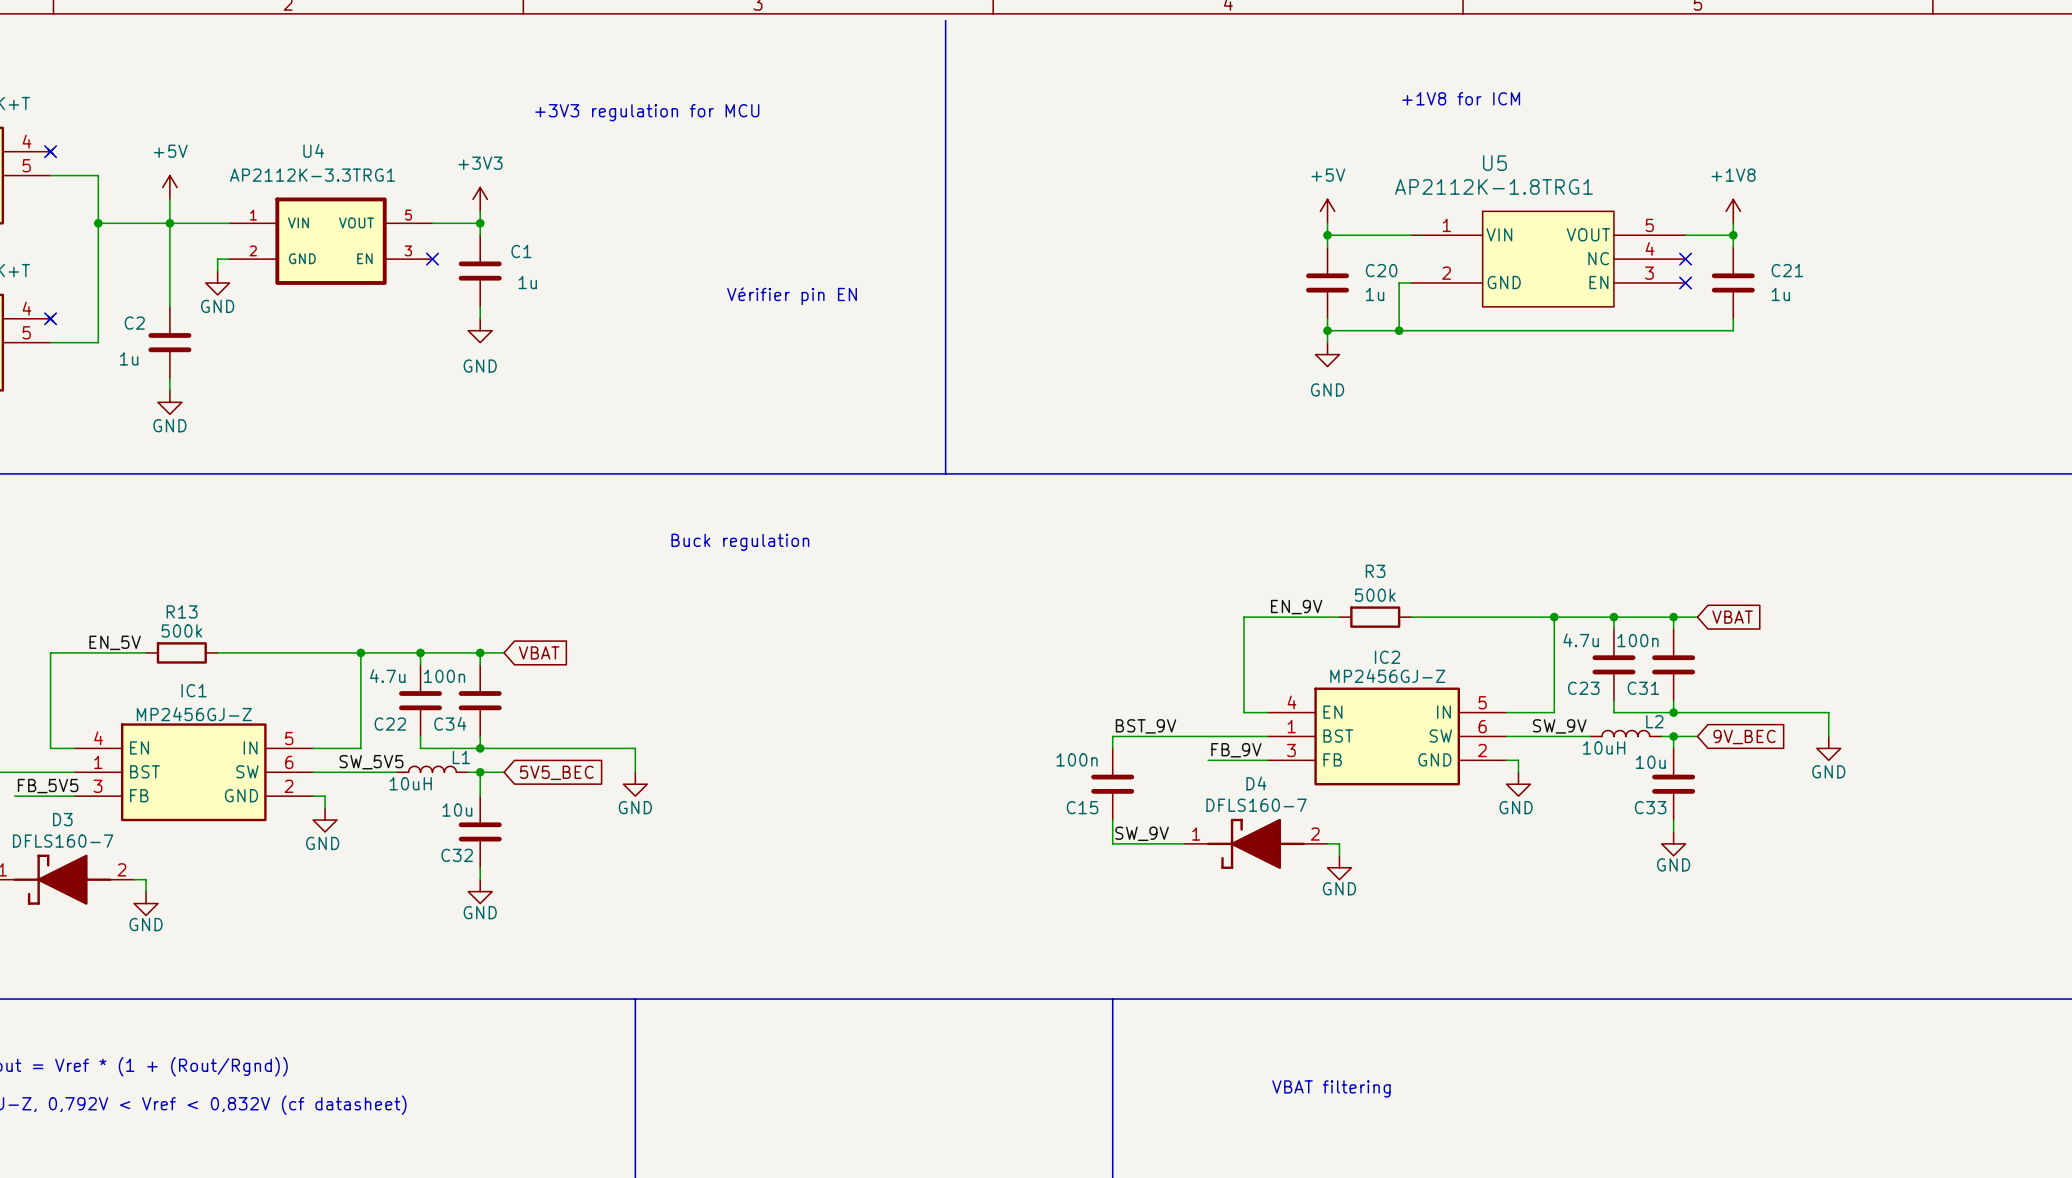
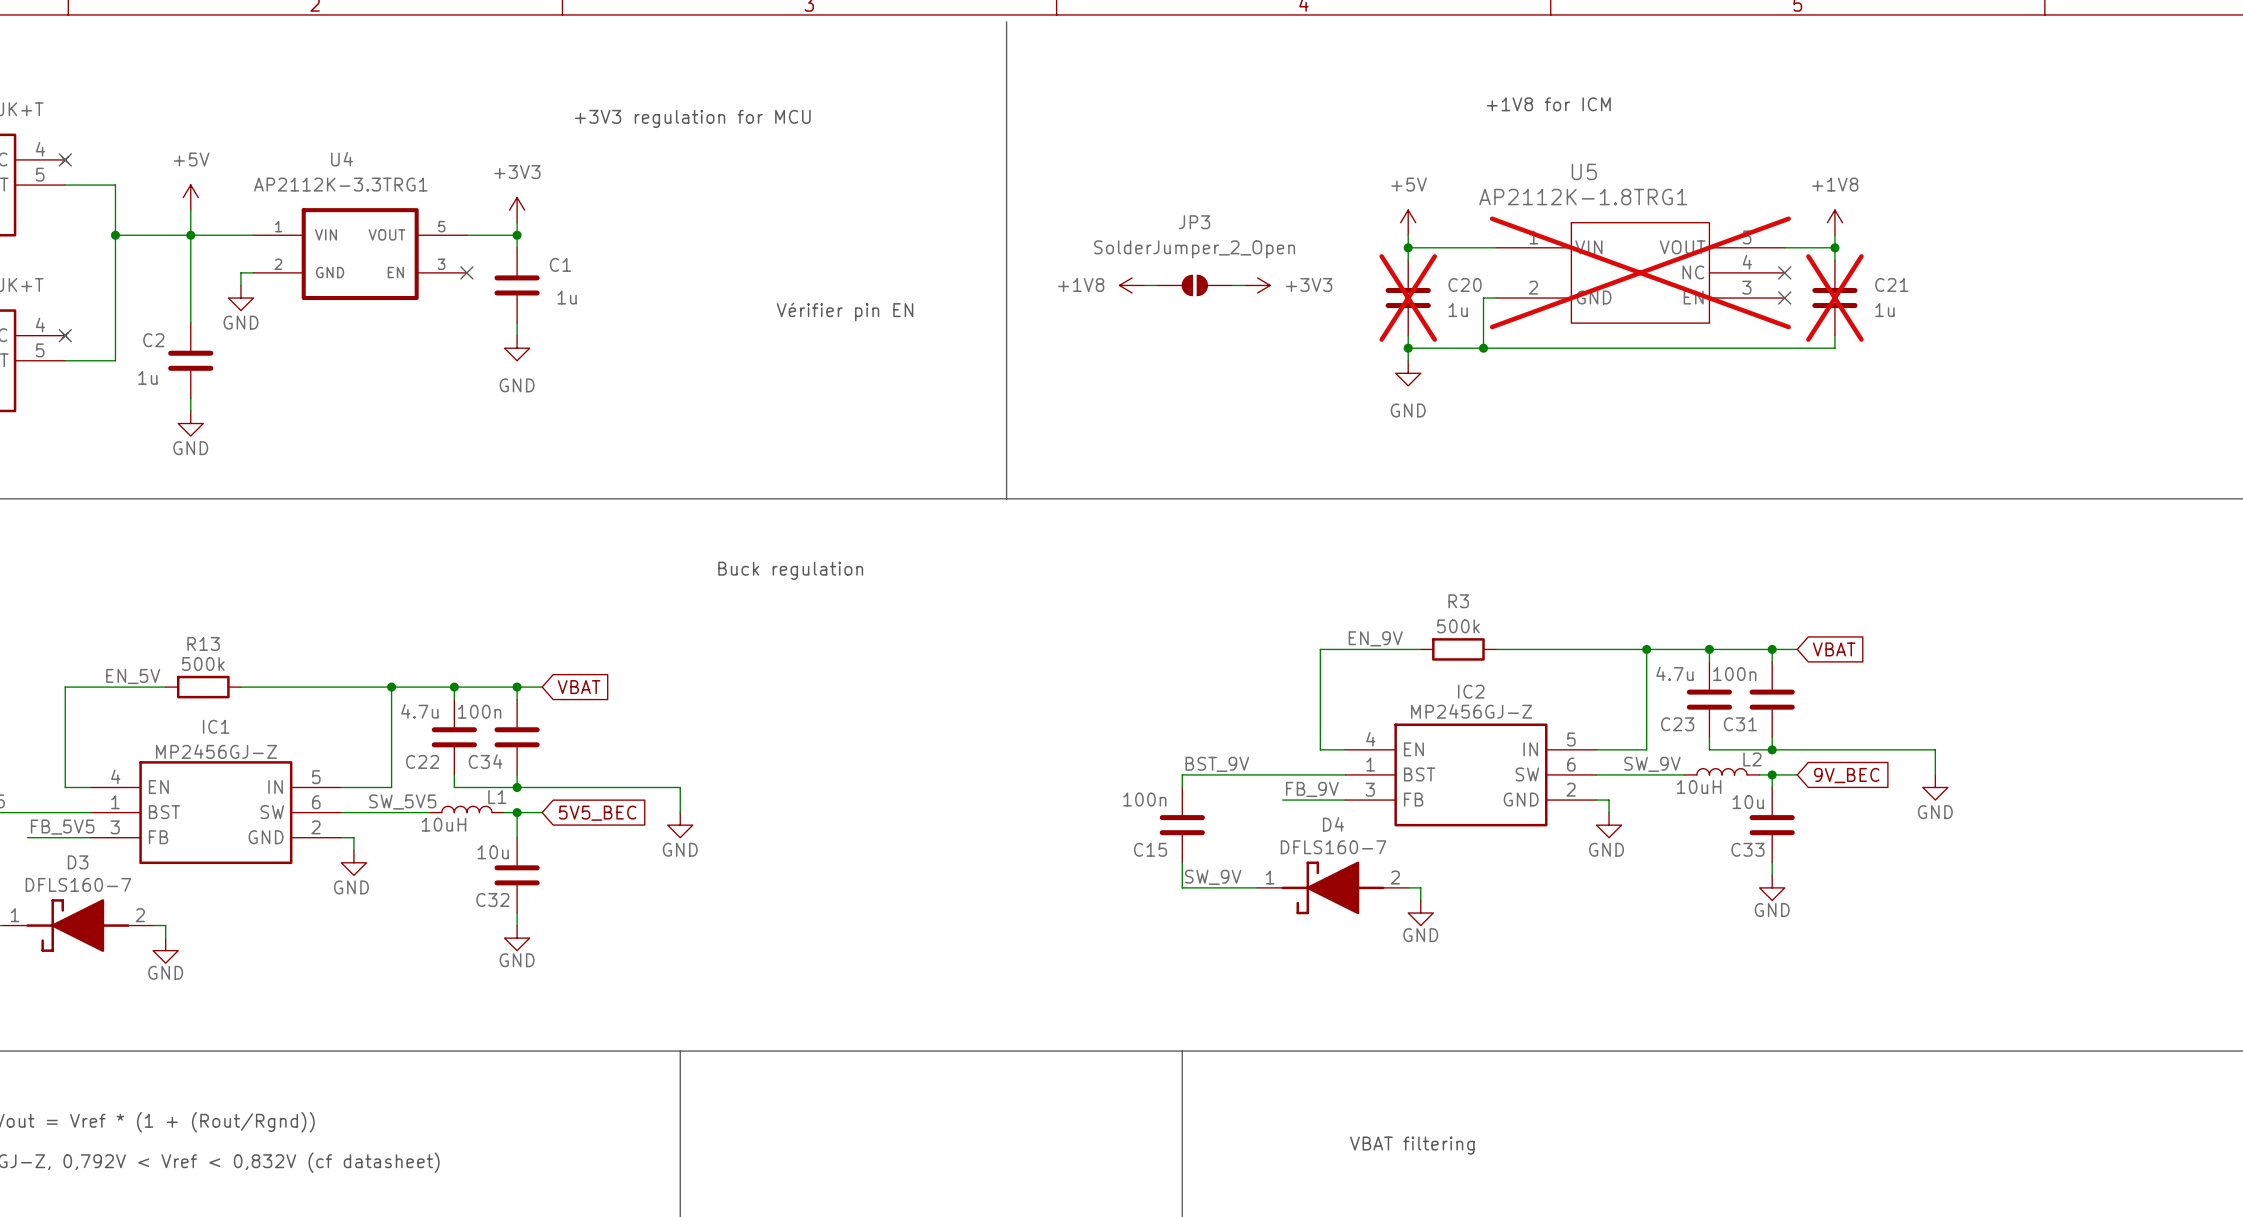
U5 do-not-place cross: none -> (1640, 272)
power symbol: none -> +1V8 (1132, 285)
wire: none -> (1144, 285) (1157, 285)
JP3: none -> SolderJumper_2_Open (1194, 285)
wire: none -> (1232, 285) (1245, 285)
power symbol: none -> +3V3 (1257, 285)
C20 do-not-place cross: none -> (1408, 298)
C21 do-not-place cross: none -> (1834, 298)

